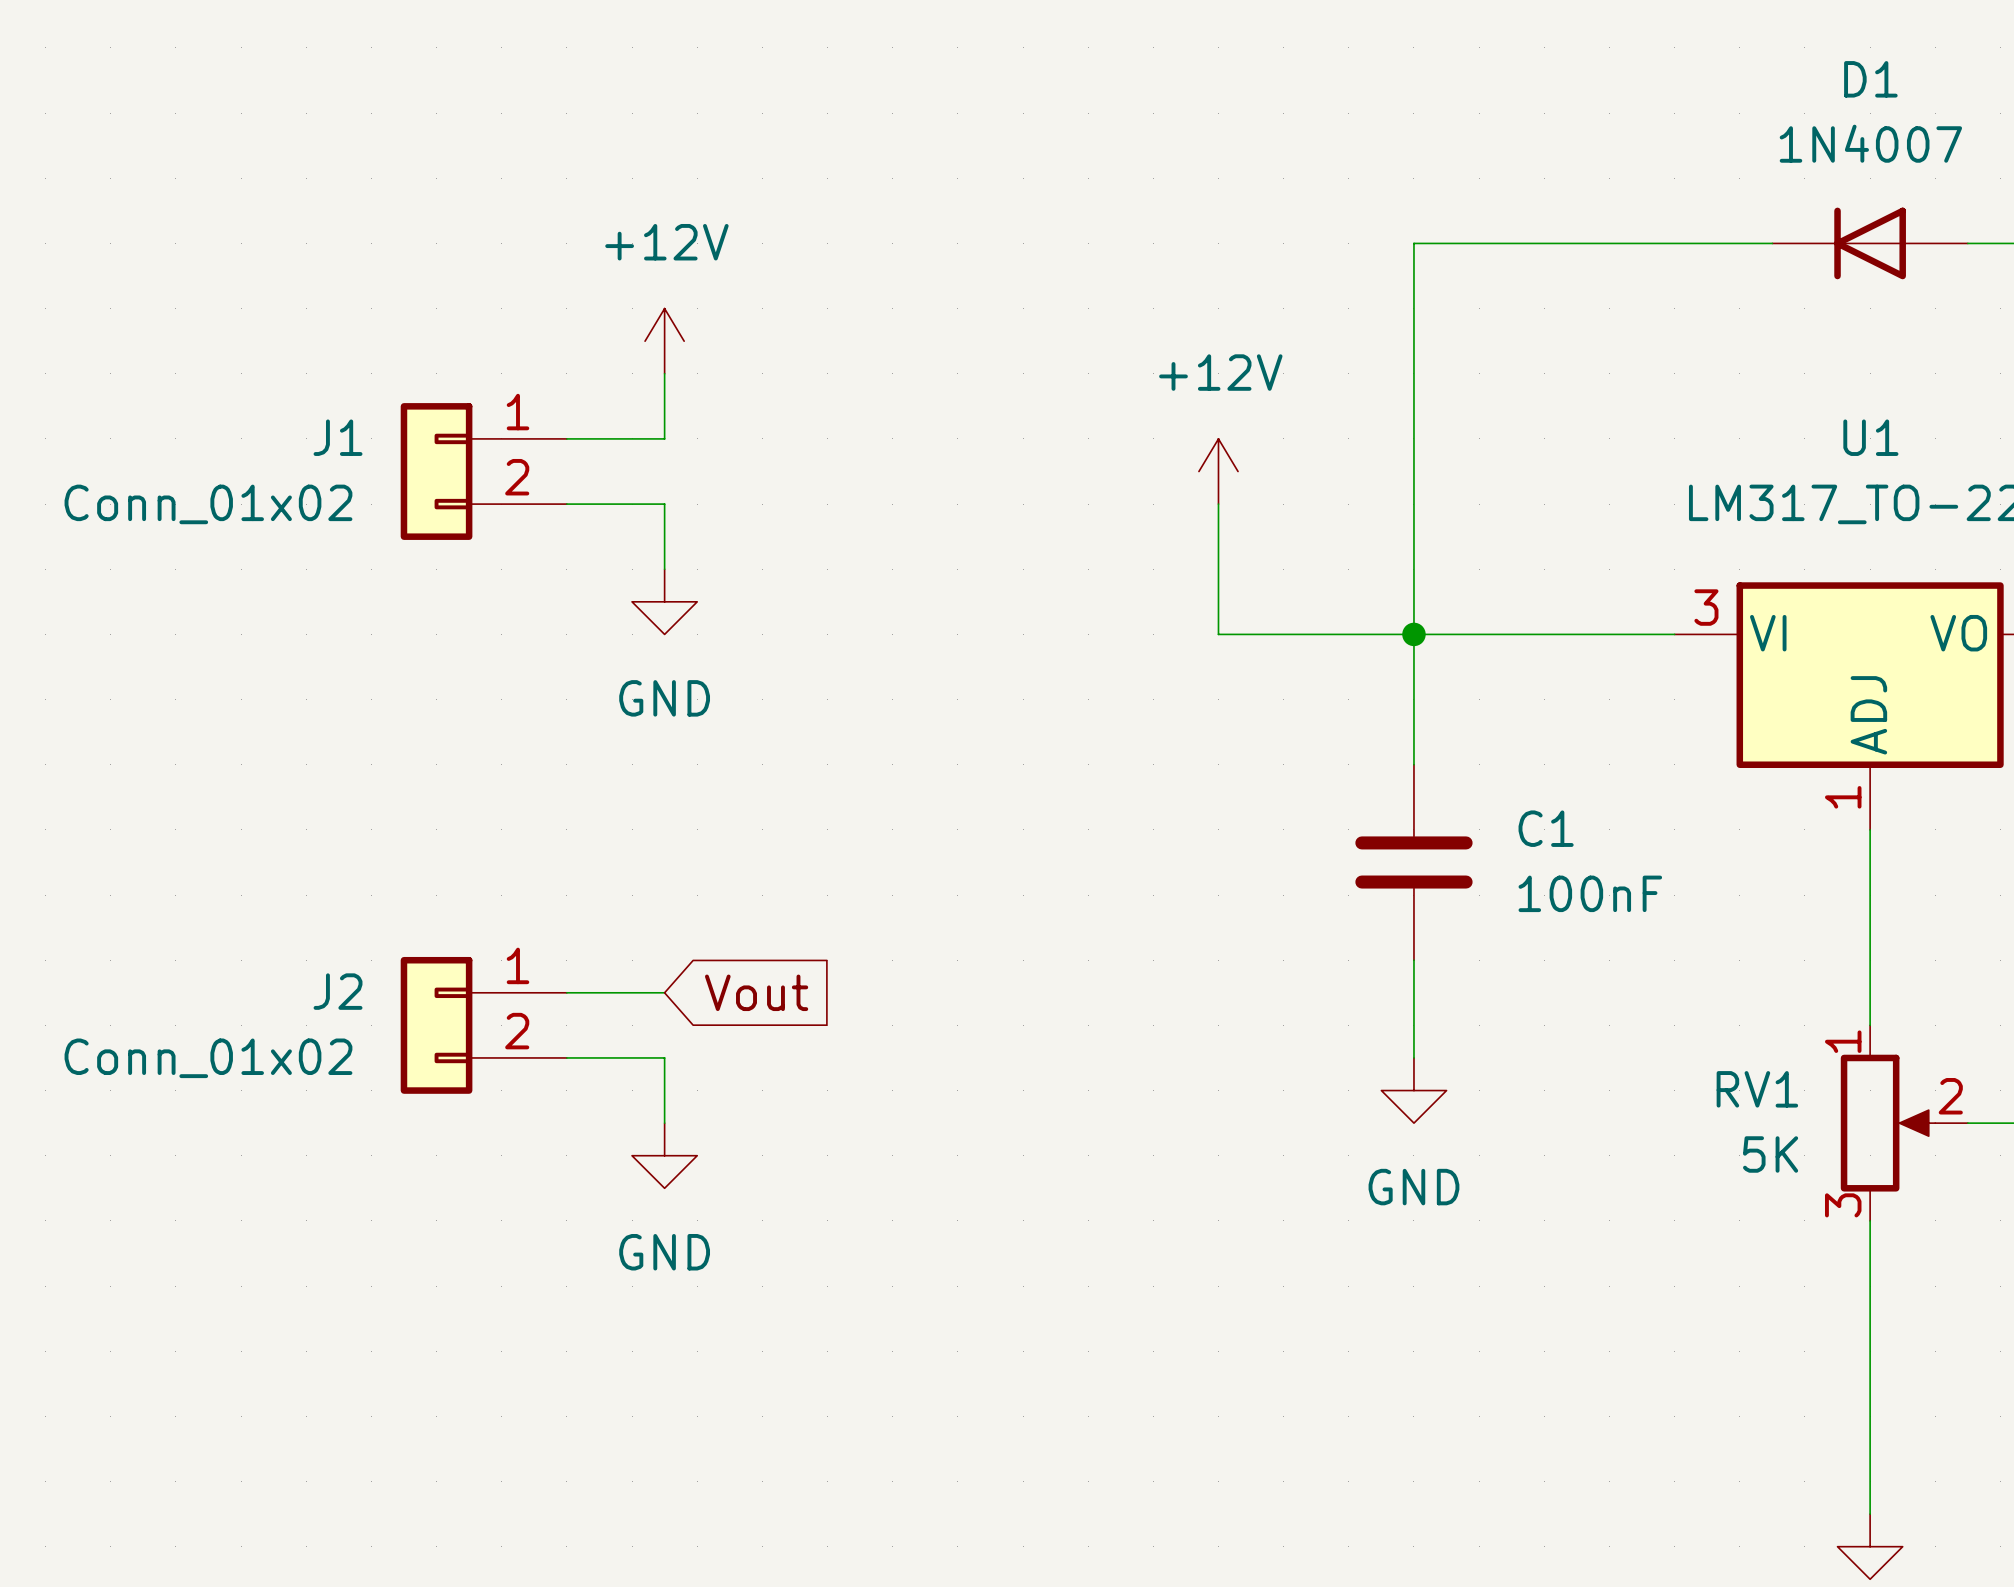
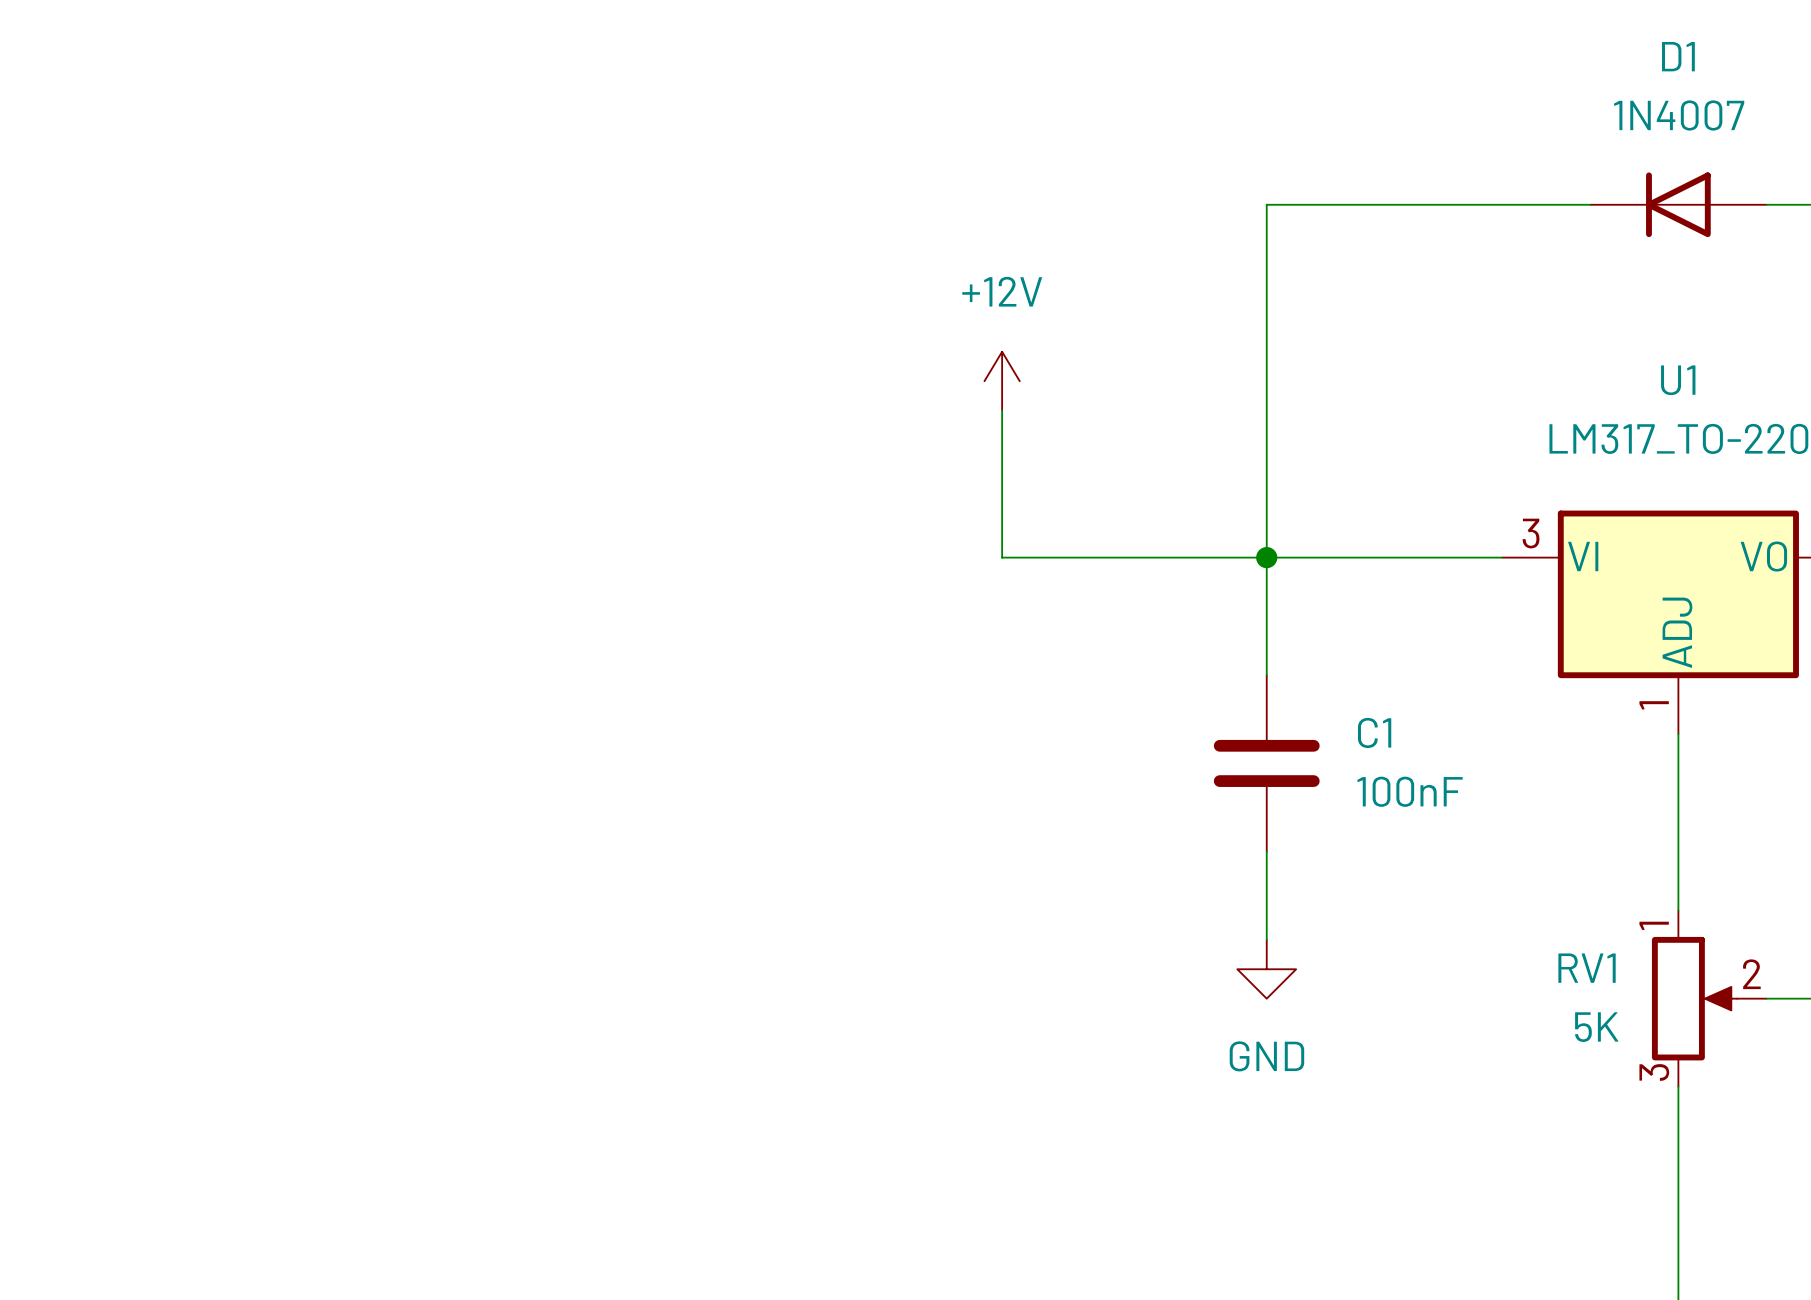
power symbol: +12V (664, 341) -> none
wire: (664, 373) (664, 438) (566, 438) -> none
J1: Conn_01x02 (483, 471) -> none
power symbol position: +12V (1218, 471) -> +12V (1002, 381)
wire: (566, 504) (664, 504) (664, 569) -> none
wire: (1218, 504) (1218, 634) -> (1002, 410) (1002, 557) (1090, 557)
power symbol: GND (664, 601) -> none
wire: (566, 992) (664, 992) -> none
global label: Vout (756, 992) -> none
J2: Conn_01x02 (483, 1025) -> none
wire: (566, 1057) (664, 1057) (664, 1123) -> none
power symbol: GND (664, 1155) -> none

